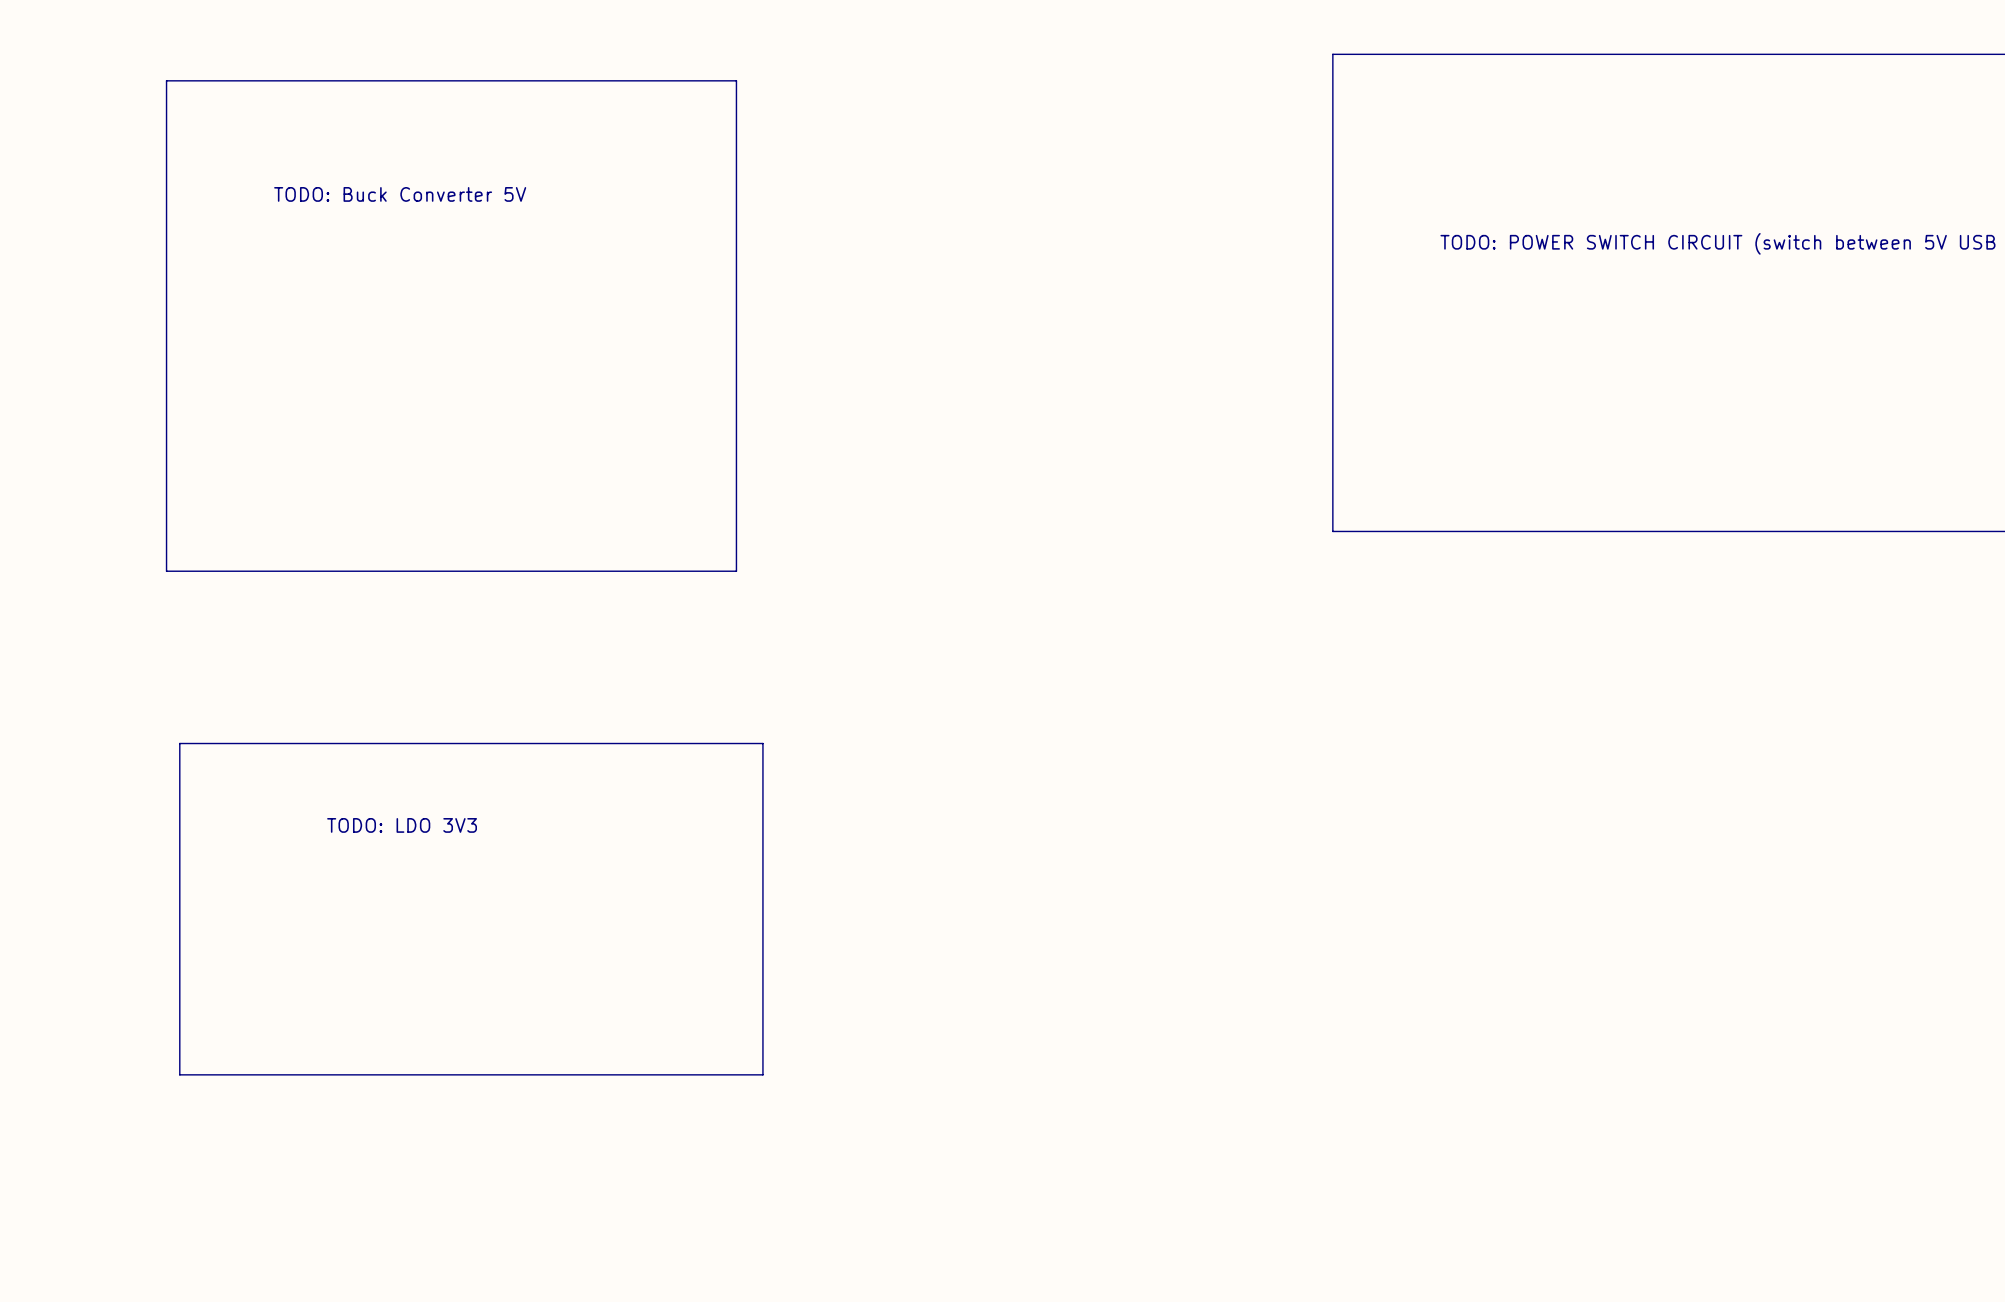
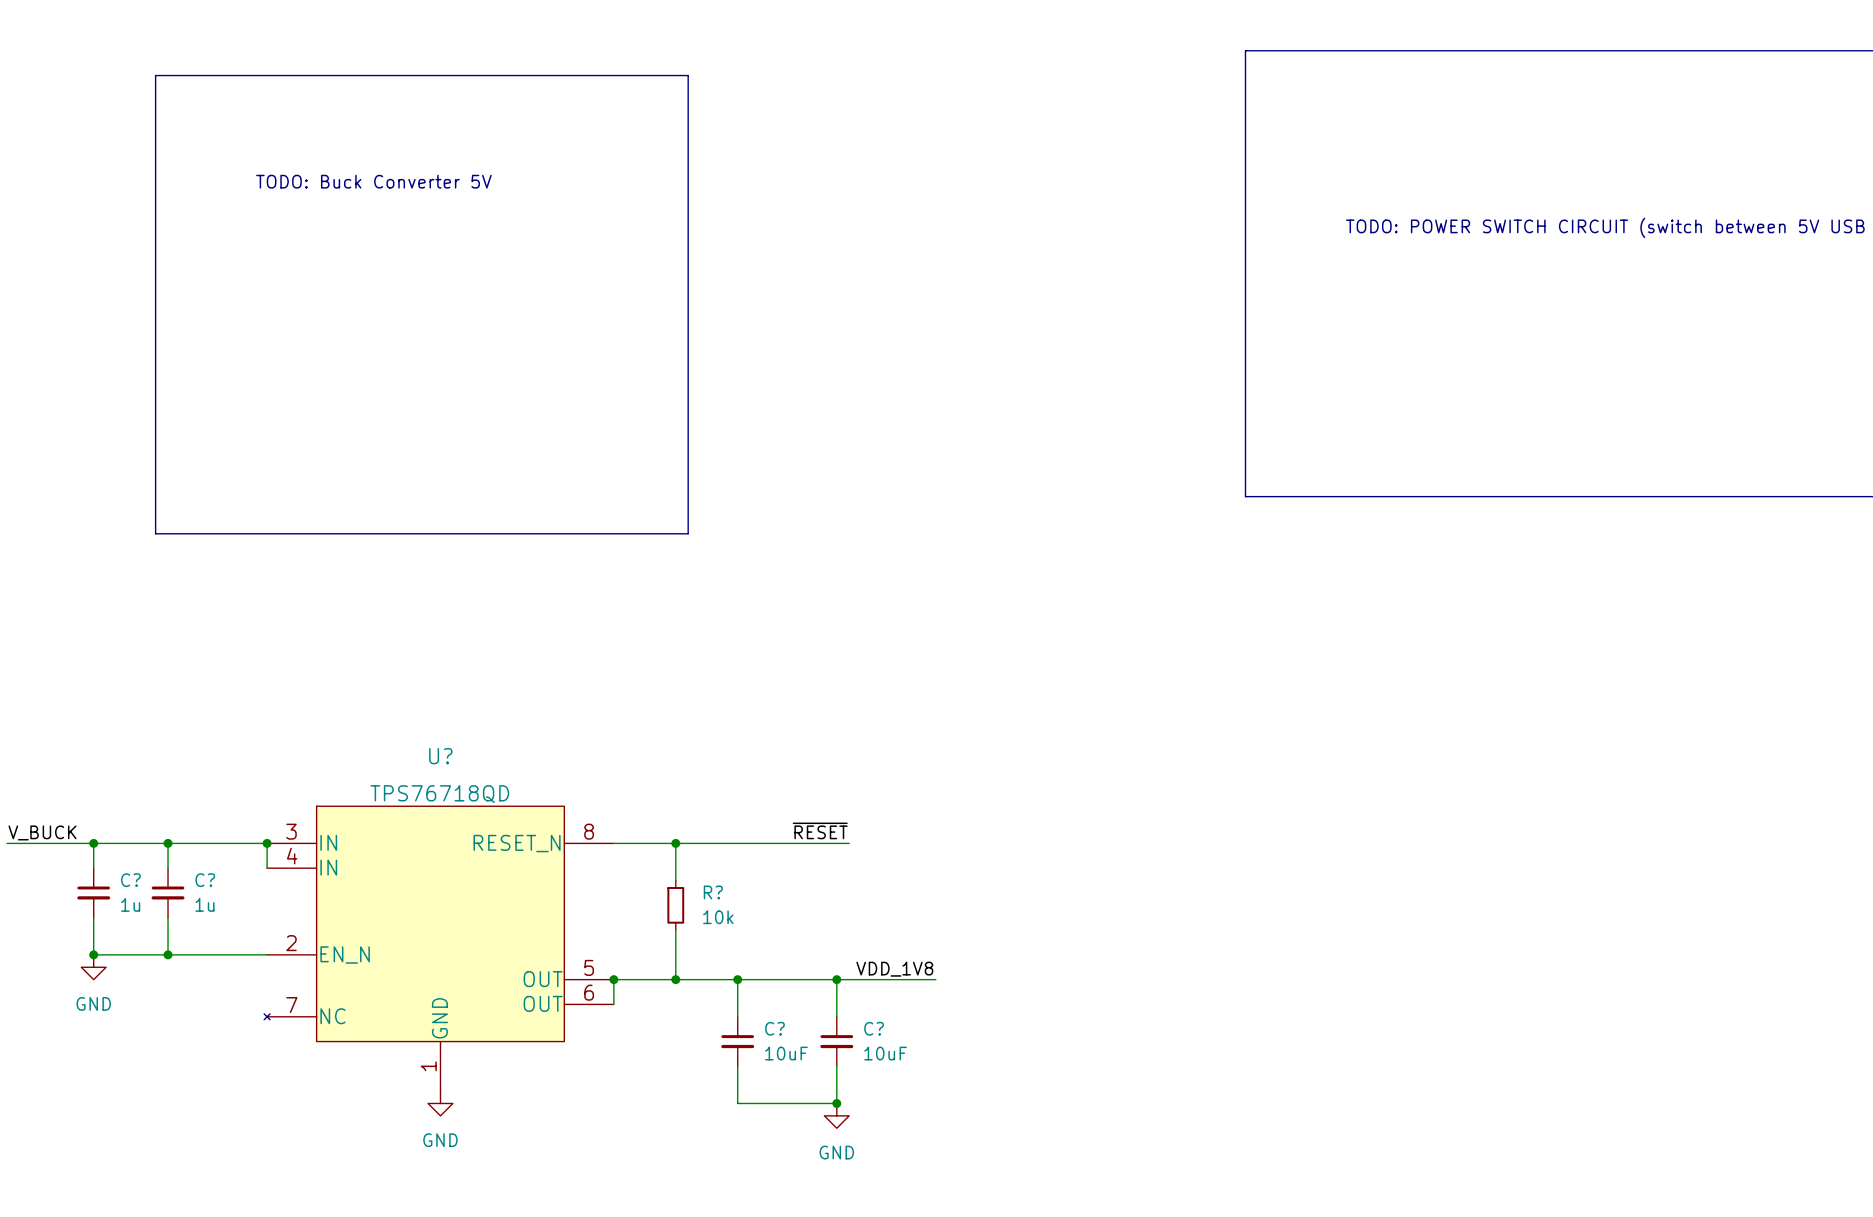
line: (179, 743) (179, 1074) (762, 1074) (762, 743) (179, 743) -> none
text: TODO: LDO 3V3 (402, 825) -> none
label: none -> ~{RESET} (820, 830)
label: none -> V_BUCK (42, 832)
wire: none -> (7, 843) (267, 843) (267, 868)
wire: none -> (93, 843) (93, 868)
junction: none -> (93, 843)
junction: none -> (168, 843)
junction: none -> (267, 843)
wire: none -> (613, 843) (849, 843)
wire: none -> (675, 843) (675, 880)
junction: none -> (675, 843)
C?: none -> 1u (93, 892)
C?: none -> 1u (168, 892)
R?: none -> 10k (675, 905)
wire: none -> (93, 917) (93, 954) (267, 954)
wire: none -> (675, 930) (675, 979)
U?: none -> TPS76718QD (439, 948)
junction: none -> (93, 954)
junction: none -> (168, 954)
power symbol: none -> GND (93, 967)
label: none -> VDD_1V8 (894, 969)
junction: none -> (613, 979)
junction: none -> (675, 979)
wire: none -> (737, 979) (737, 1016)
junction: none -> (737, 979)
wire: none -> (836, 979) (836, 1016)
junction: none -> (836, 979)
wire: none -> (935, 979) (613, 979) (613, 1004)
C?: none -> 10uF (737, 1041)
C?: none -> 10uF (836, 1041)
wire: none -> (737, 1066) (737, 1103) (836, 1103) (836, 1066)
power symbol: none -> GND (440, 1103)
junction: none -> (836, 1103)
power symbol: none -> GND (836, 1115)

